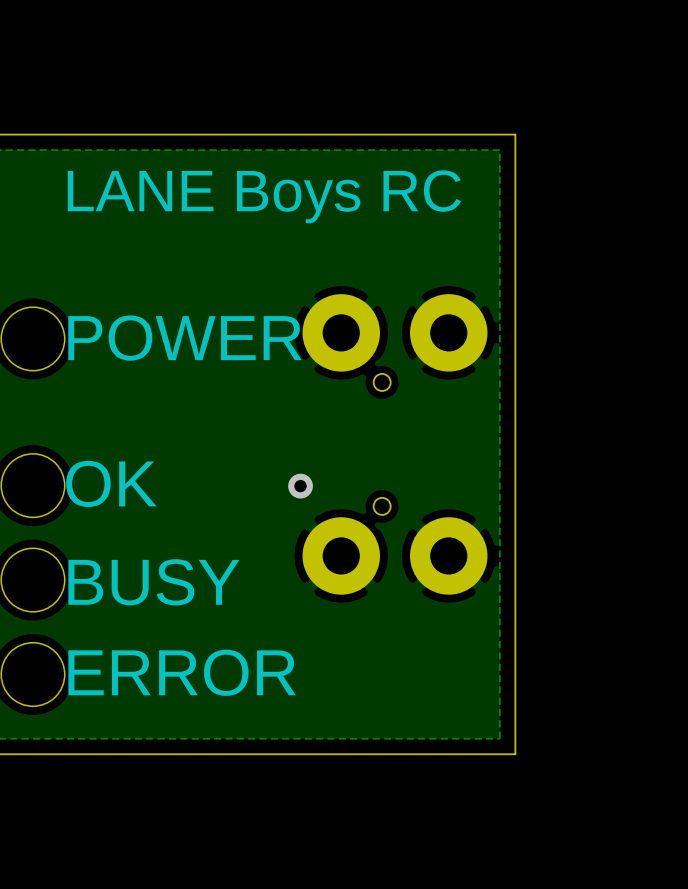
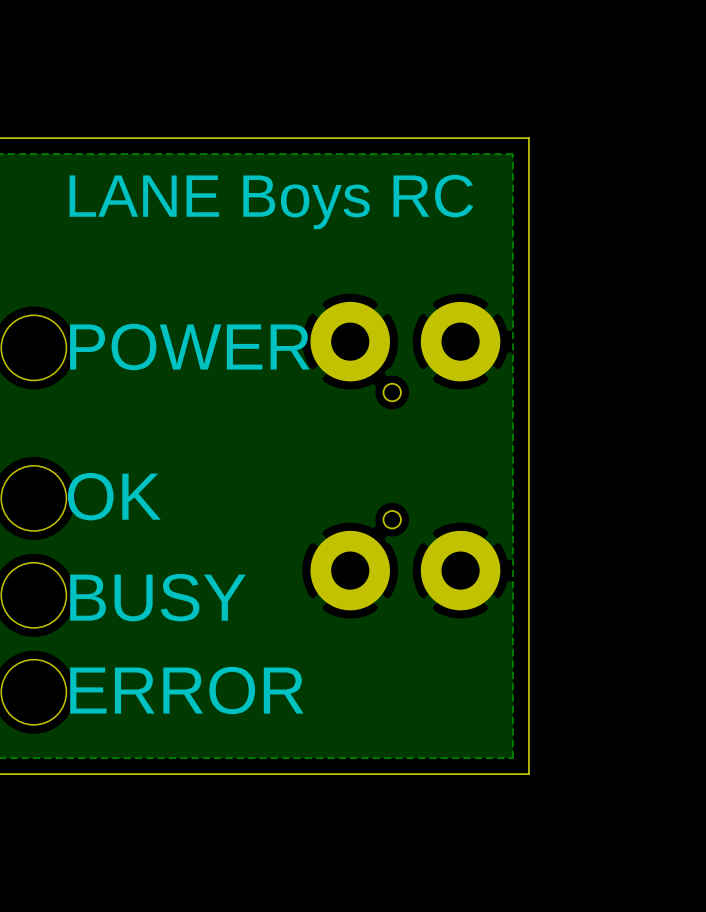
via: (300, 486) -> none

